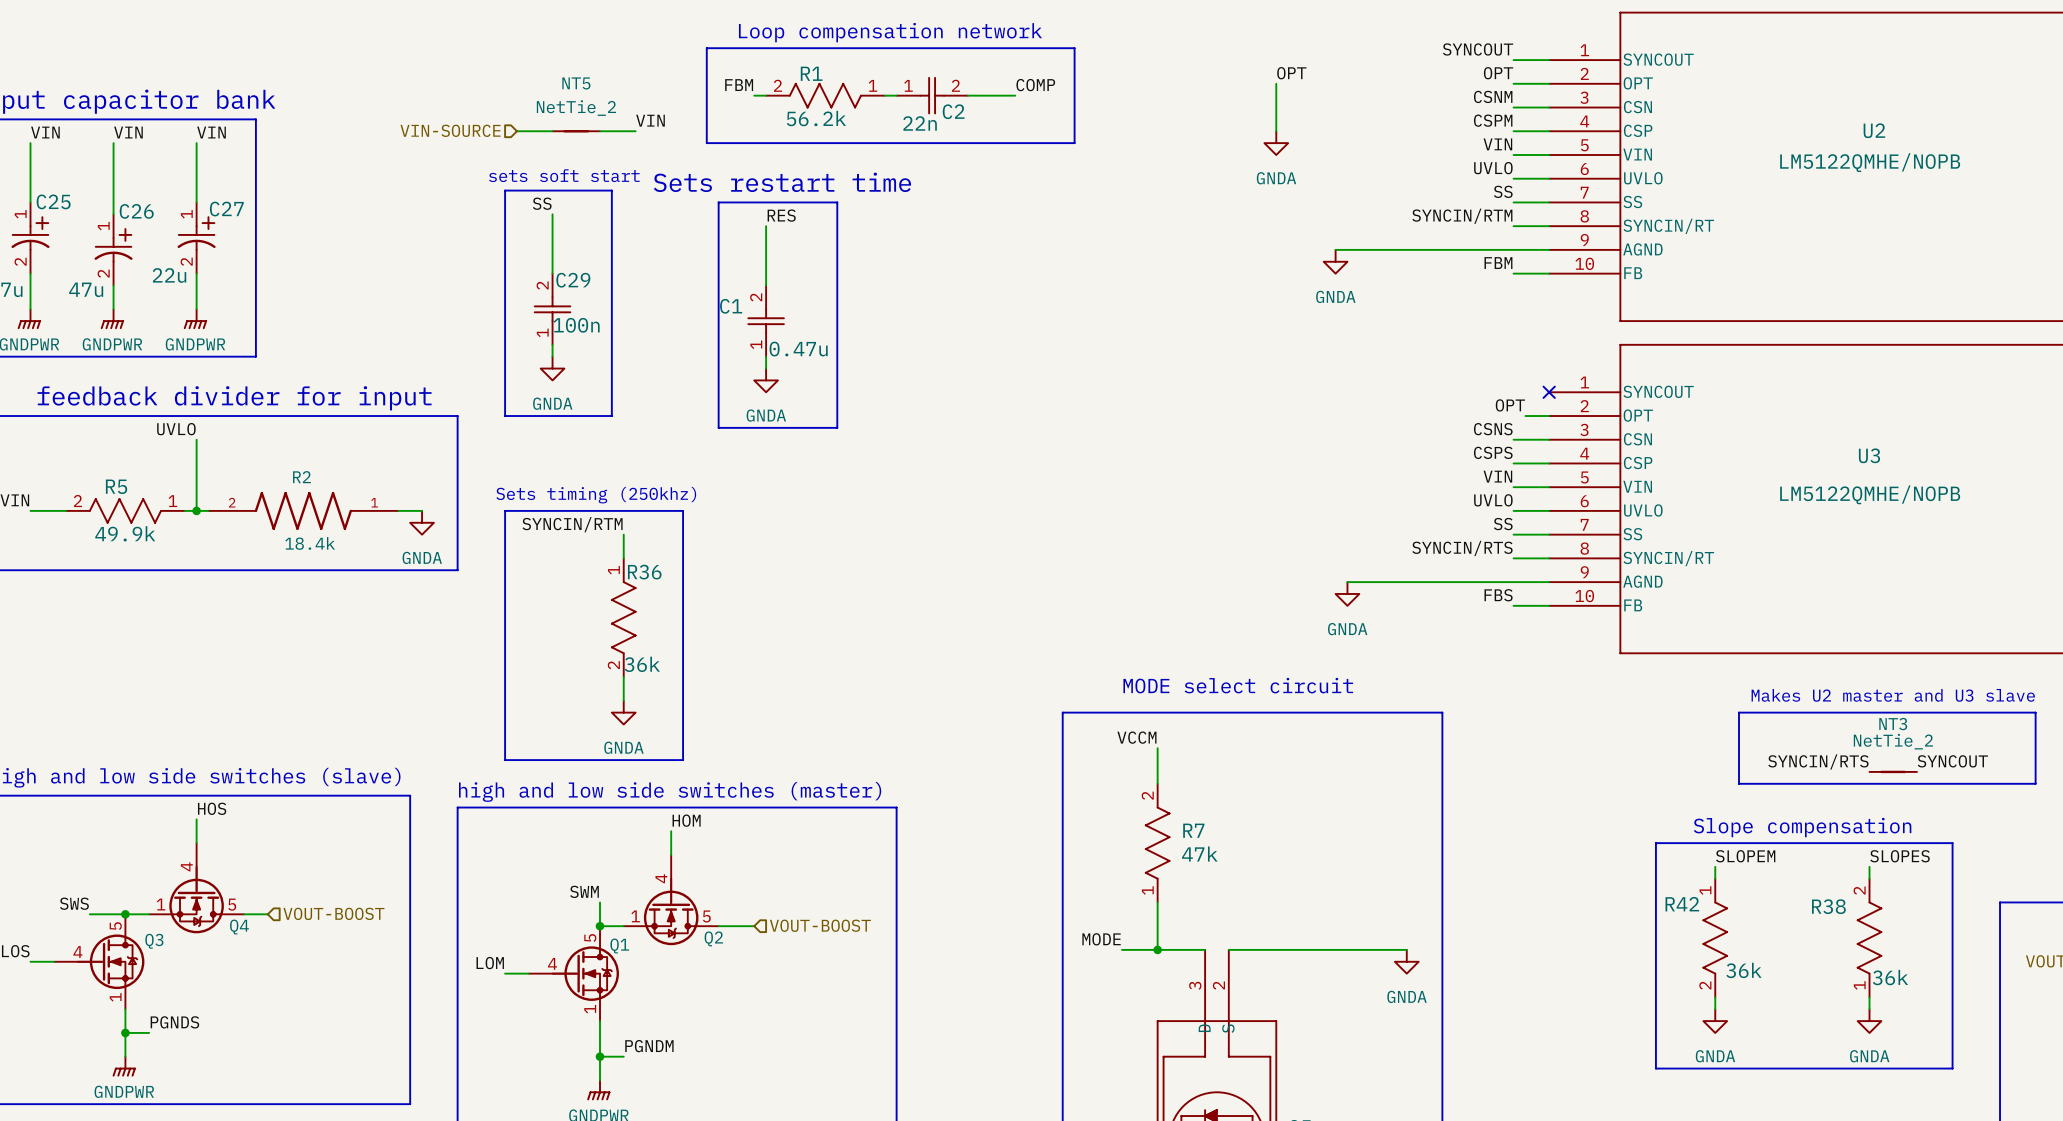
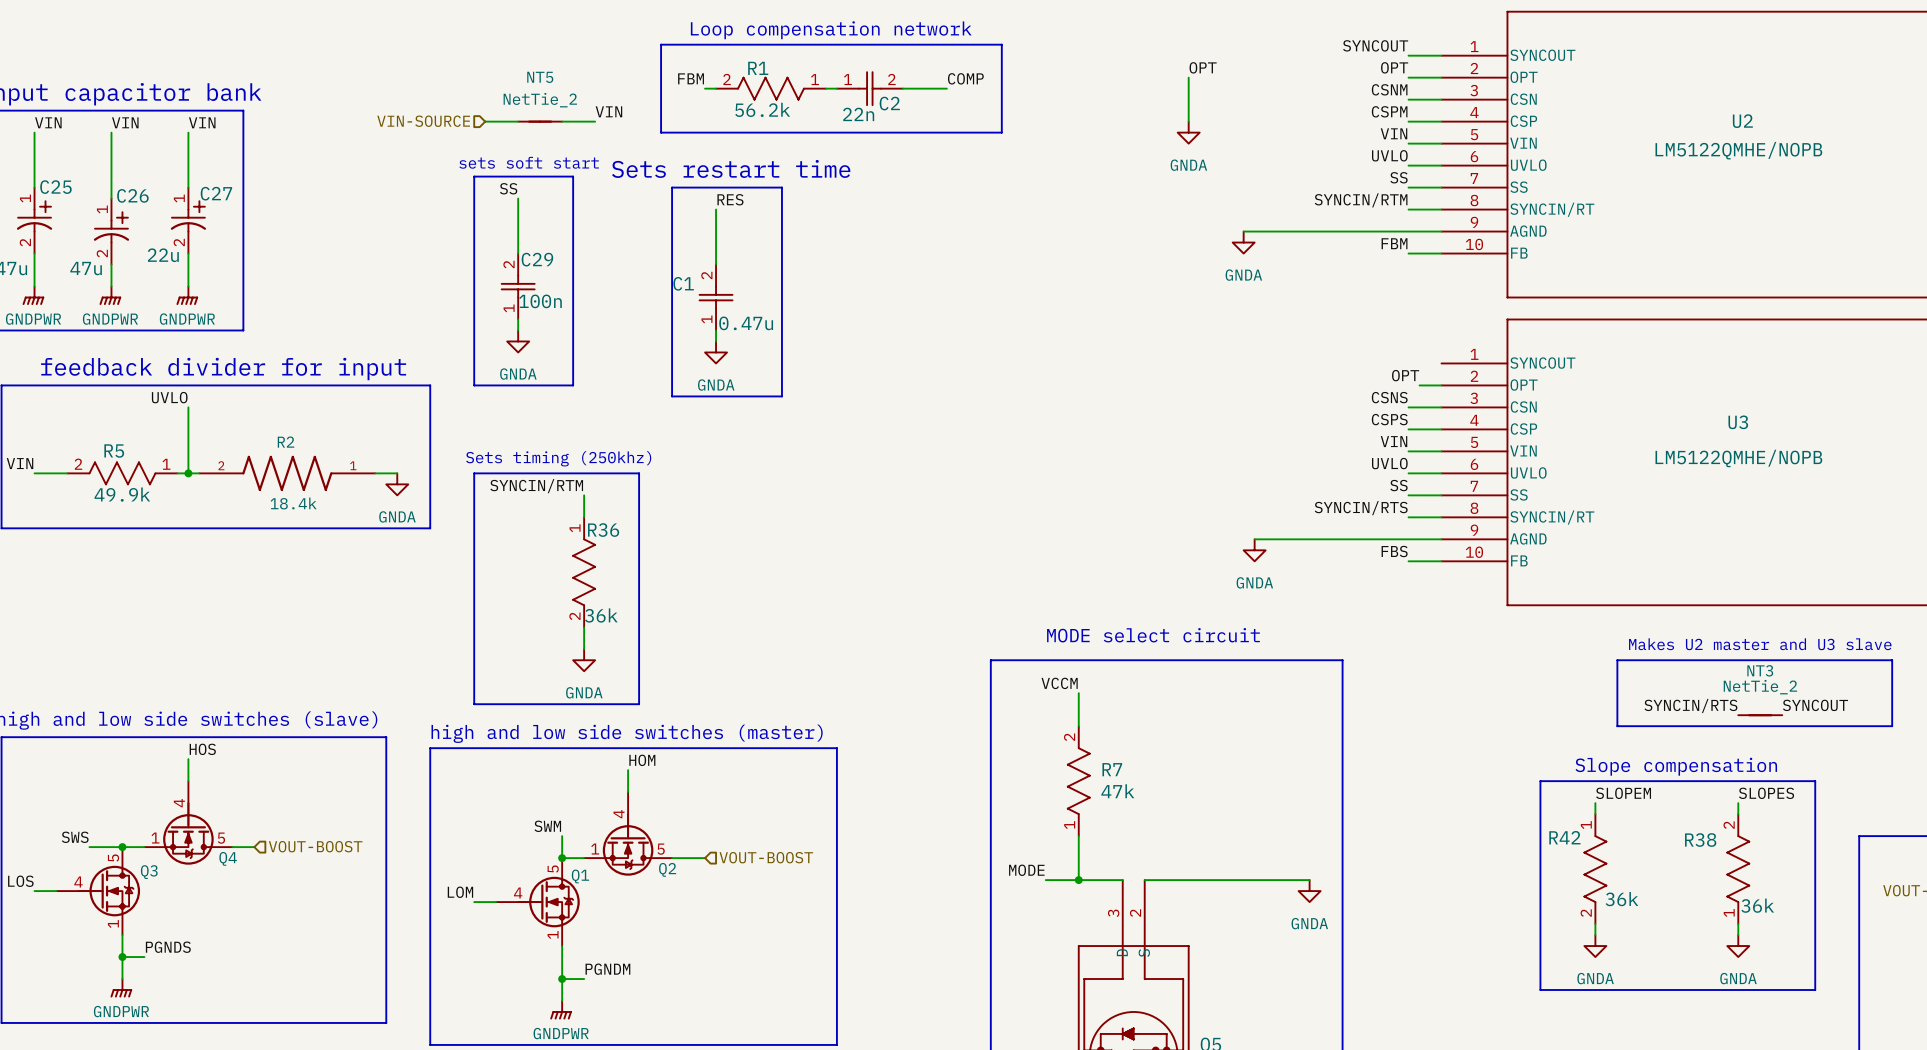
no-connect mark: (1549, 392) -> none

